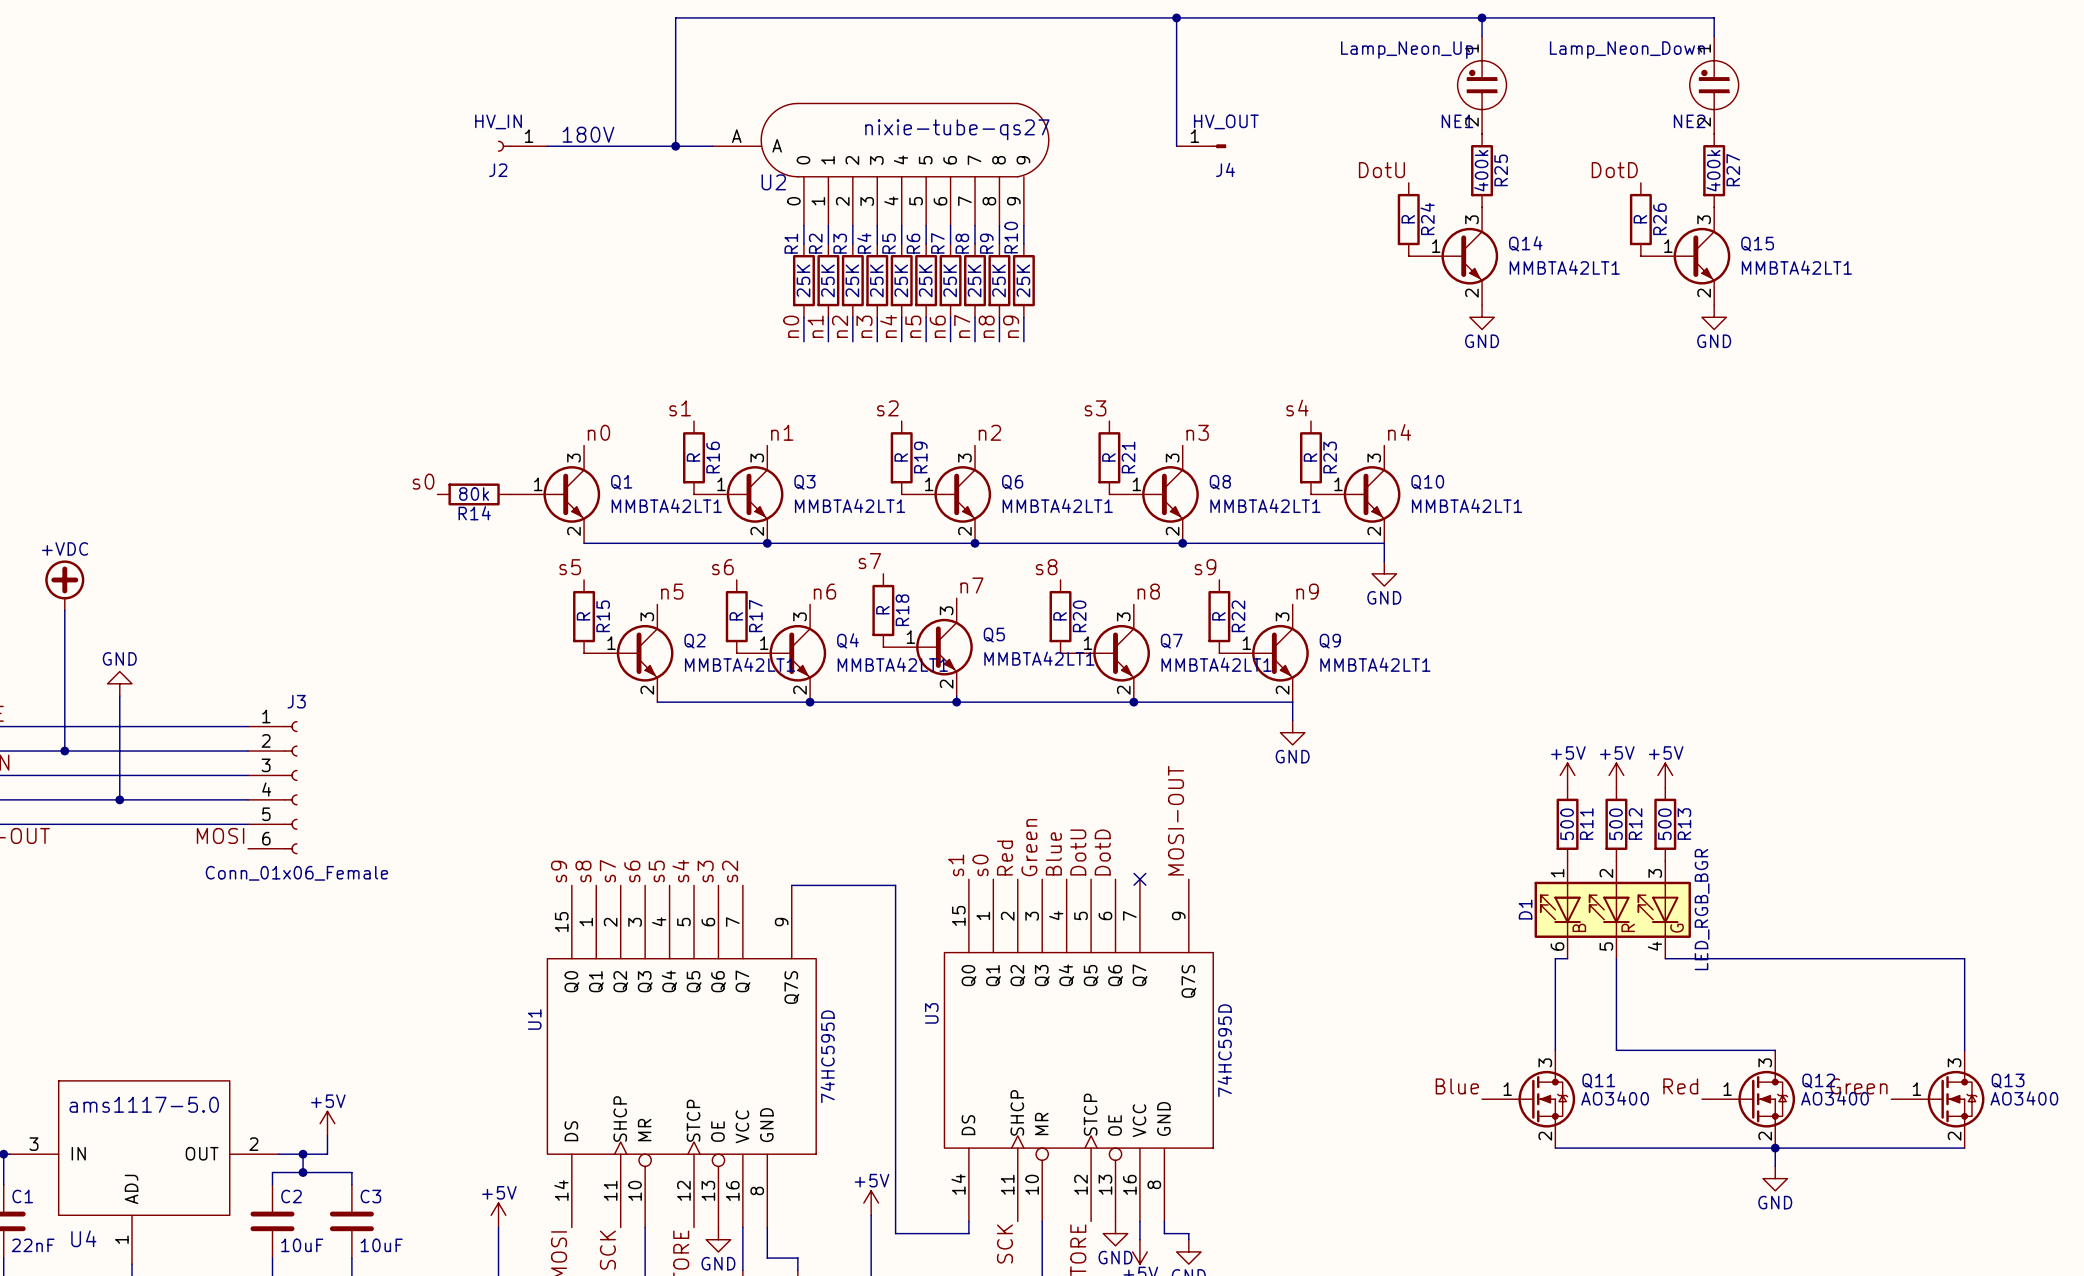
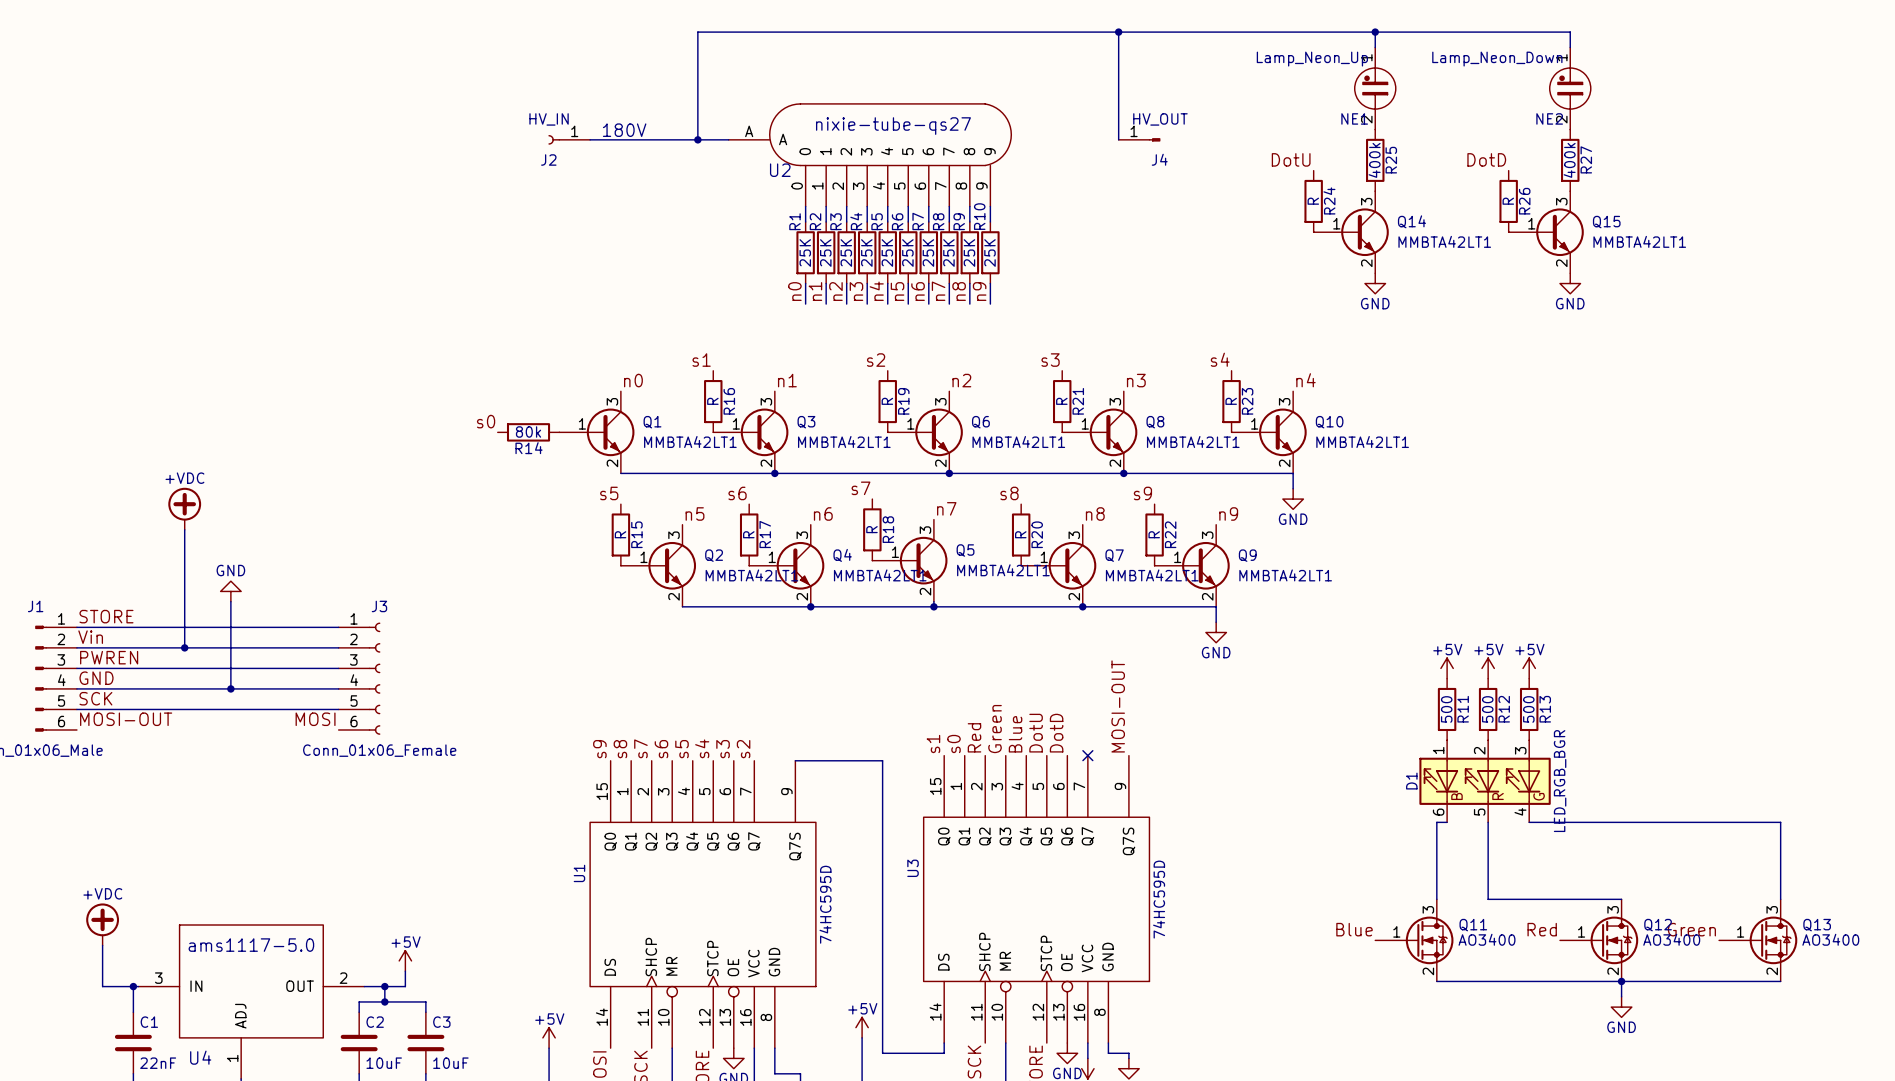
U2 value position: nixie-tube-qs27 (957, 129) -> nixie-tube-qs27 (893, 126)

